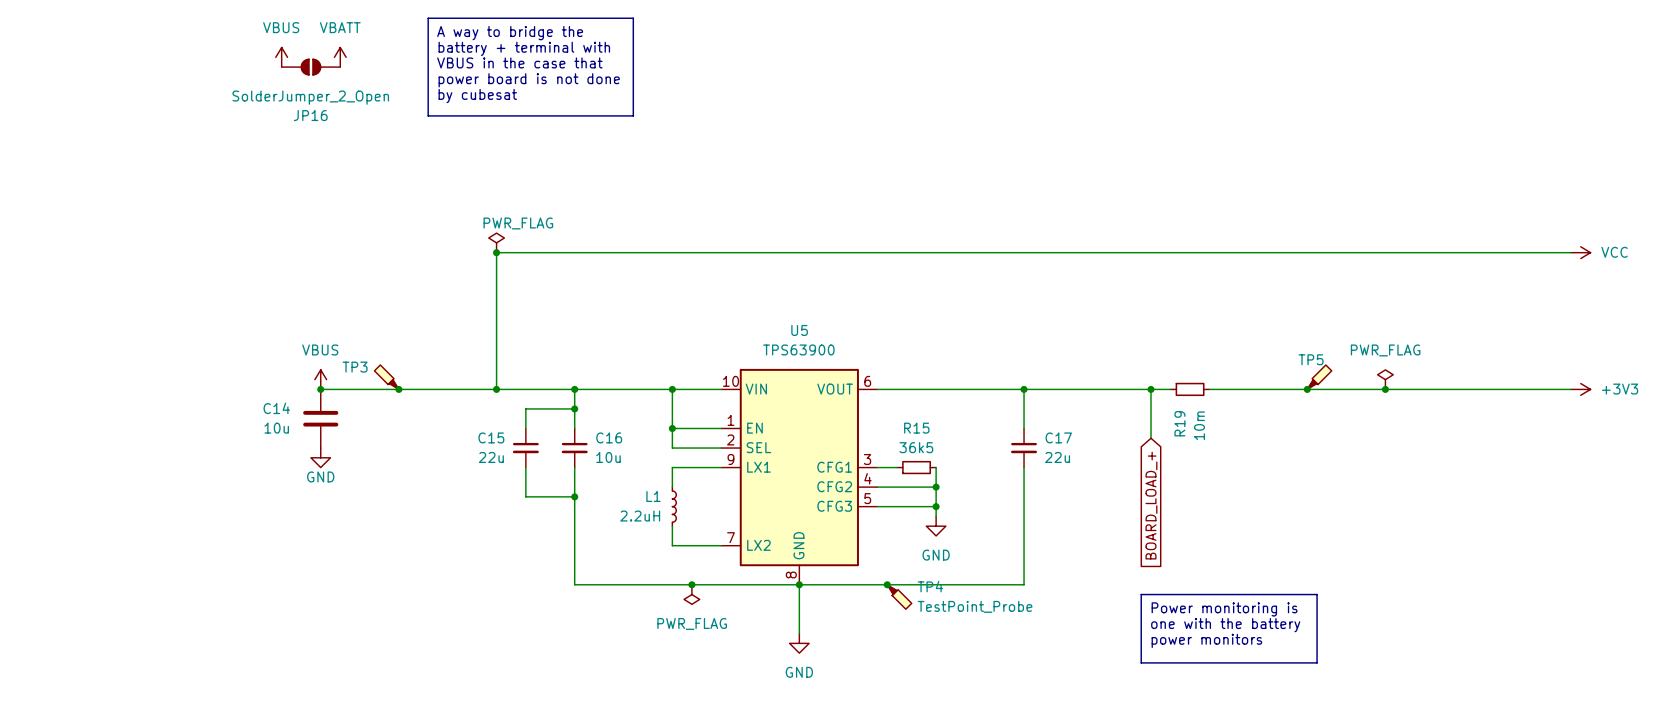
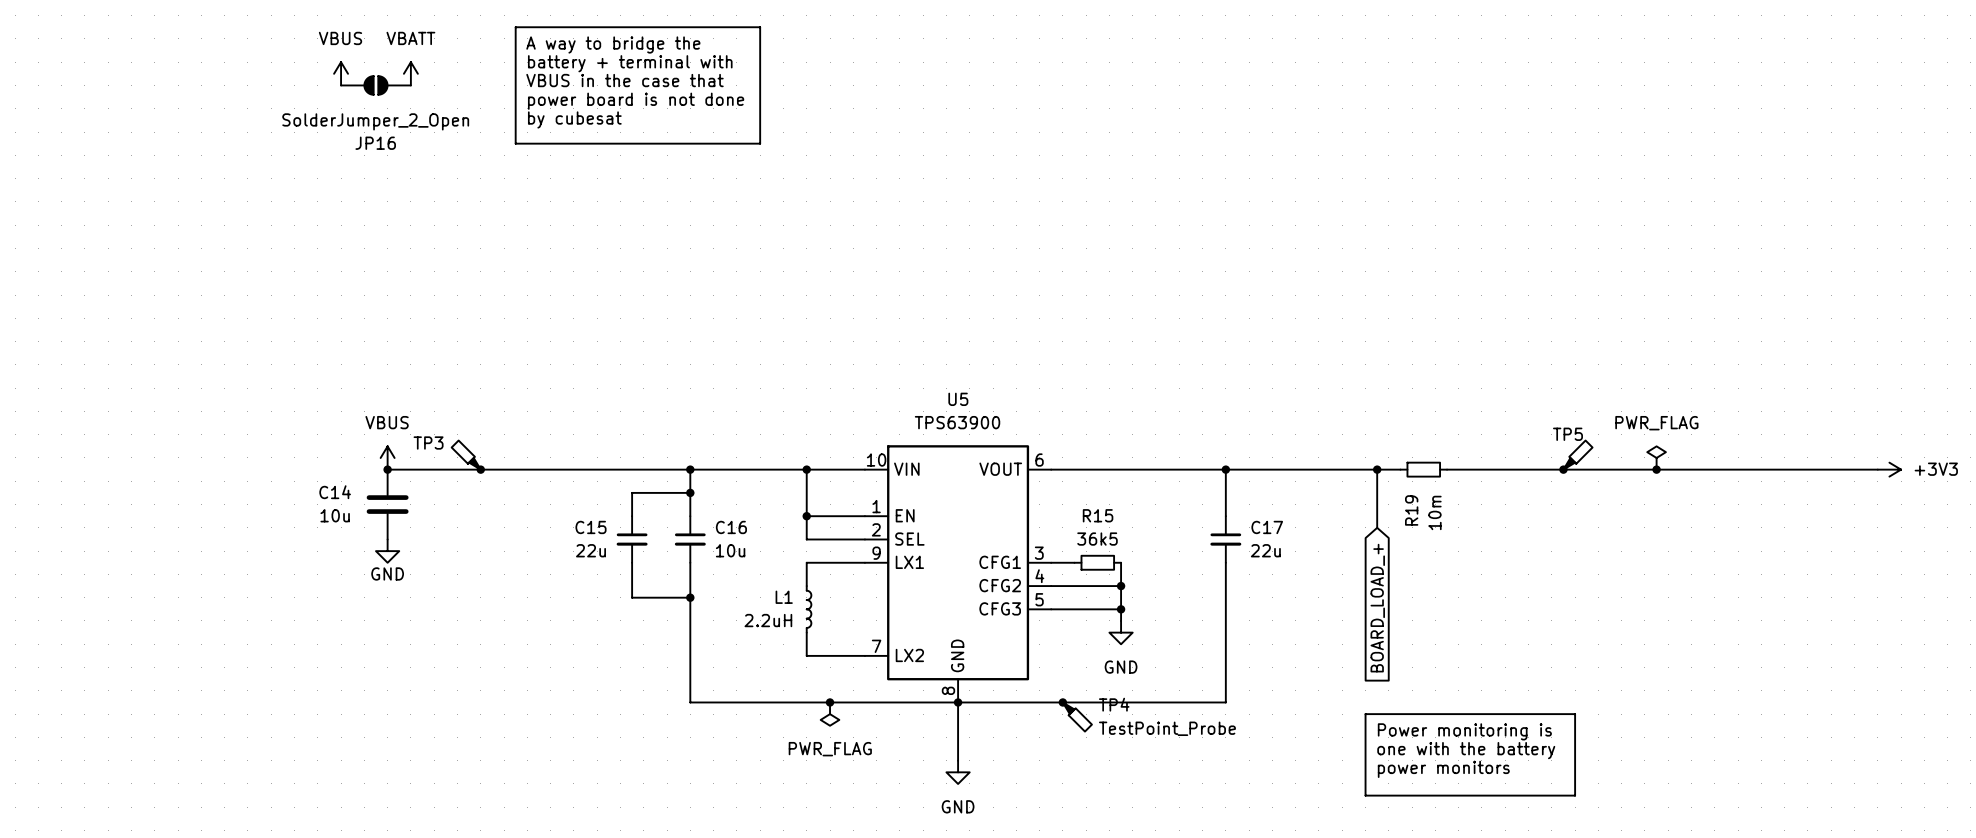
power symbol: PWR_FLAG (496, 242) -> none
junction: (496, 252) -> none
wire: (1571, 252) (496, 252) (496, 389) -> none
power symbol: VCC (1580, 252) -> none
junction: (496, 389) -> none

